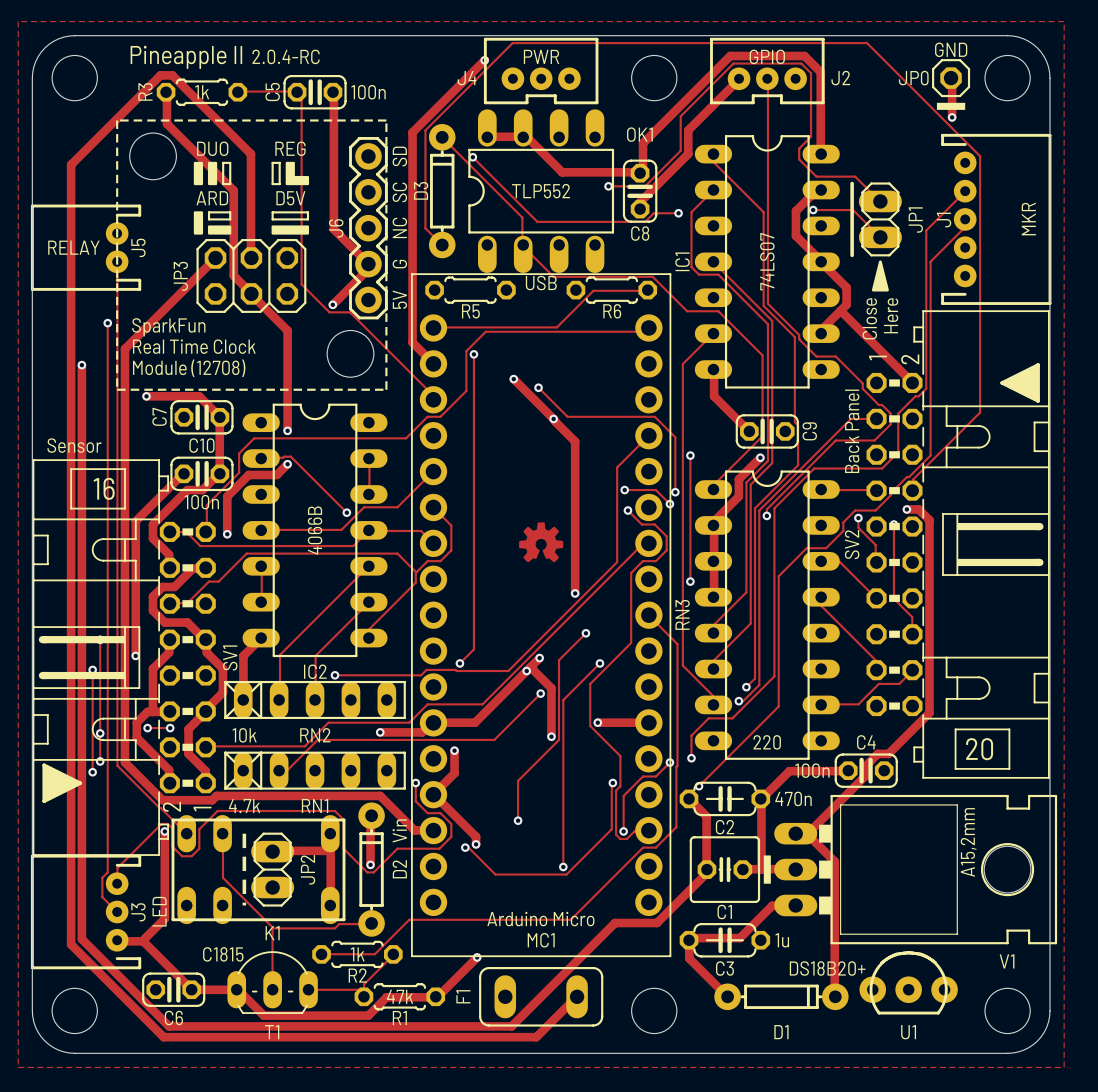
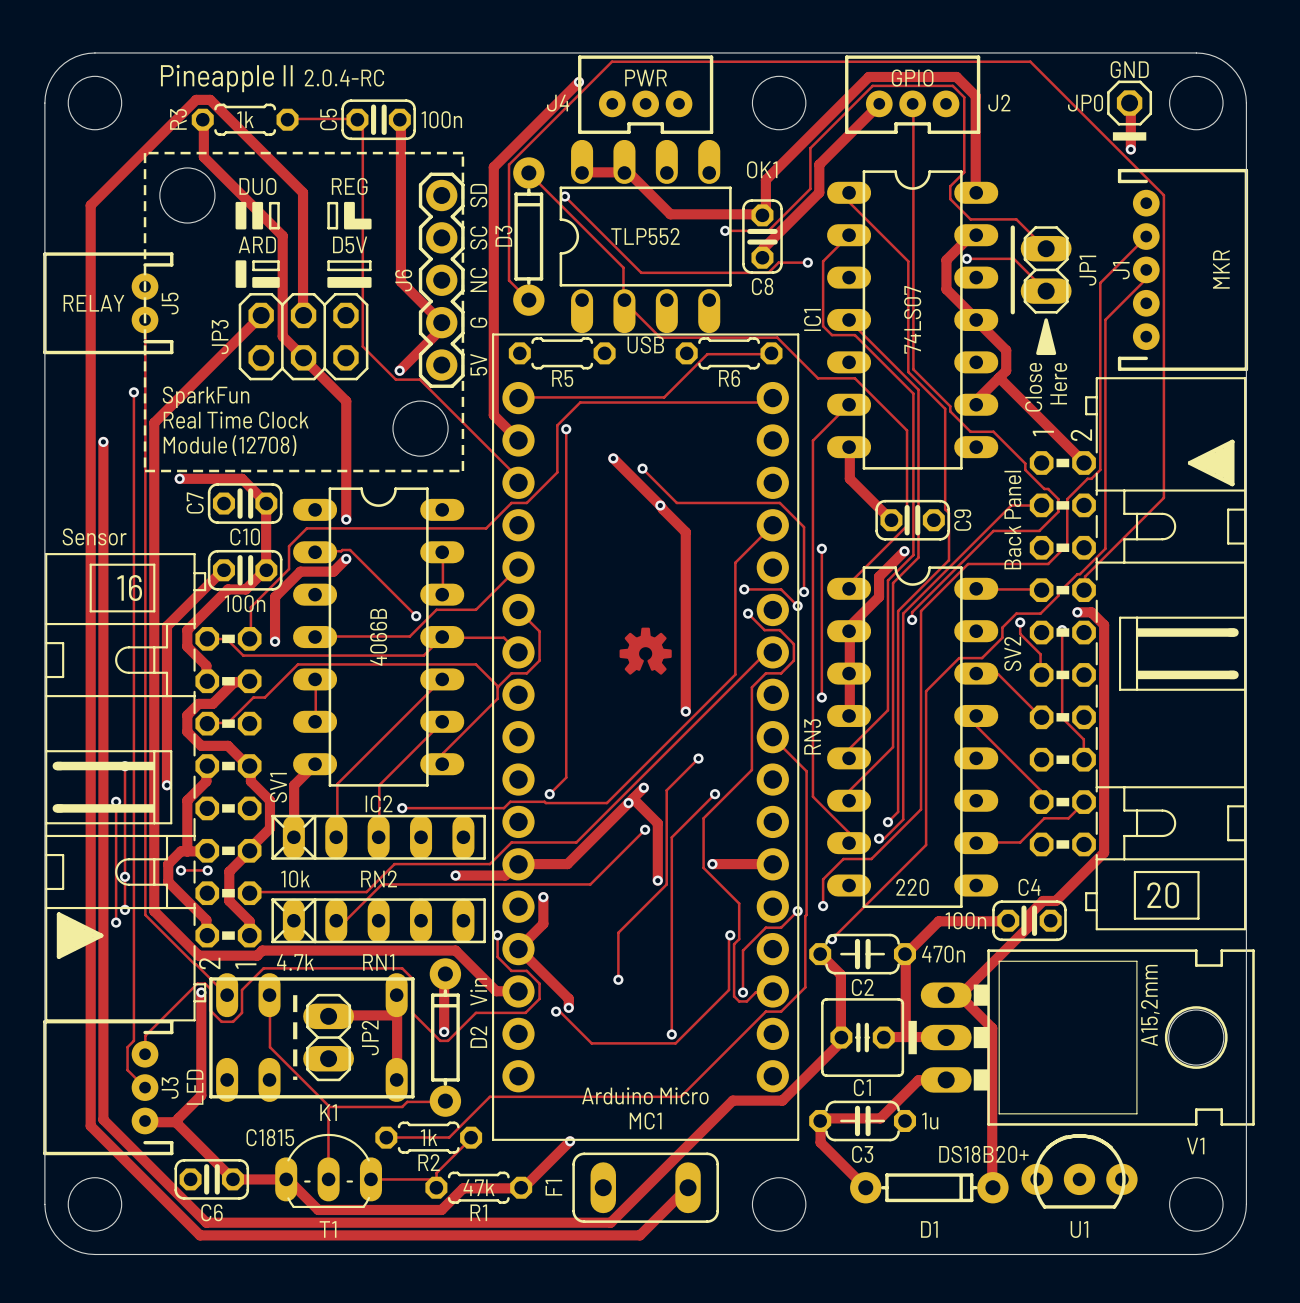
zone outline: (18, 21) (1064, 21) (1064, 1067) (18, 1067) (18, 21) -> none

